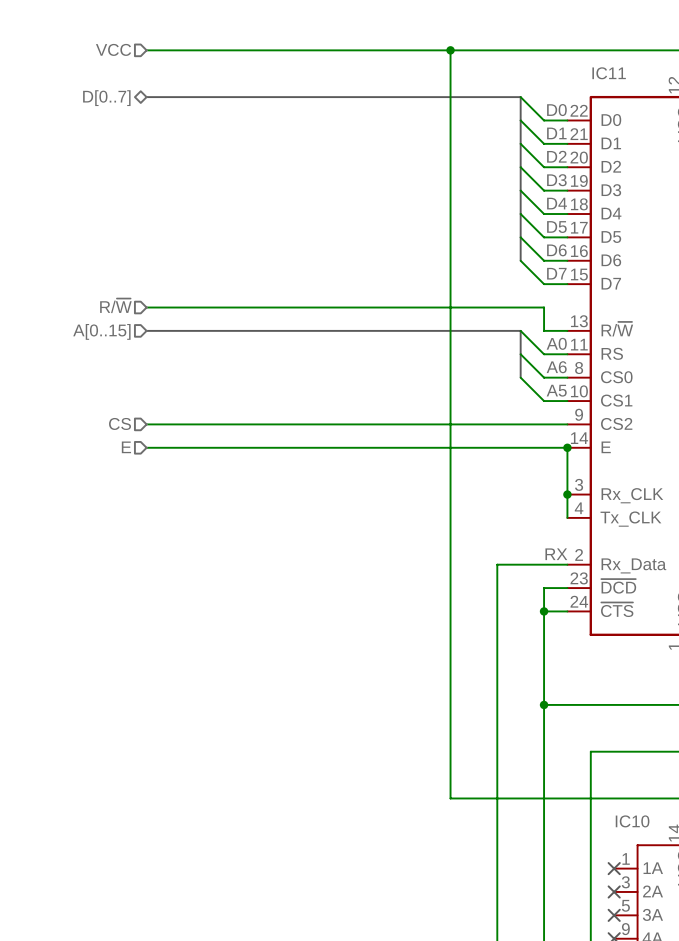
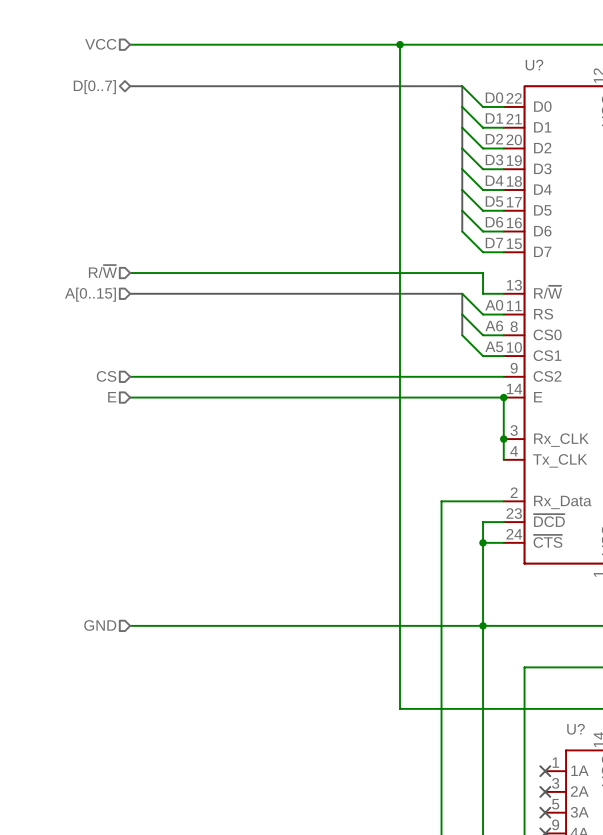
IC11 name: IC11 (609, 73) -> U? (534, 65)
label: RX (556, 554) -> none
hierarchical label: none -> GND (100, 625)
wire: none -> (130, 625) (483, 625)
IC10 name: IC10 (632, 821) -> U? (575, 729)

